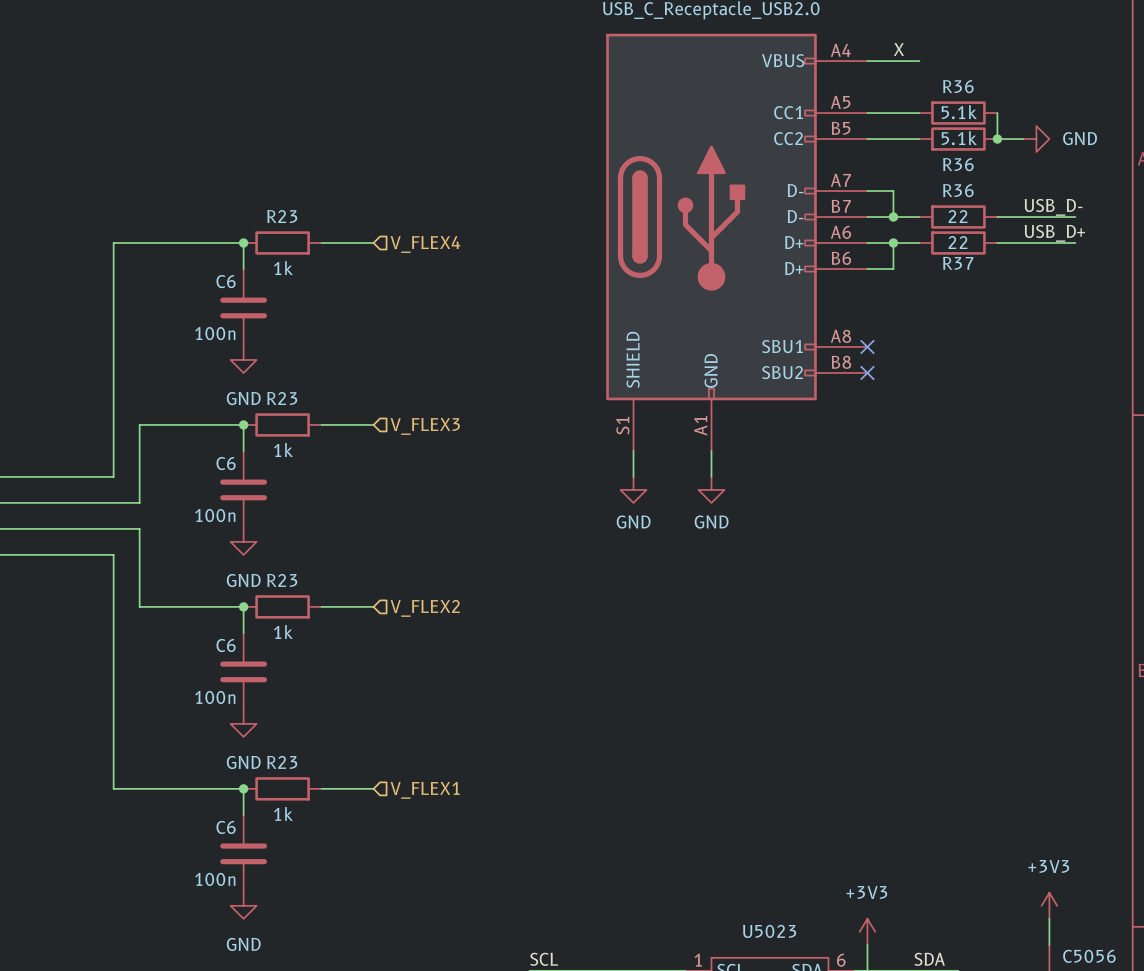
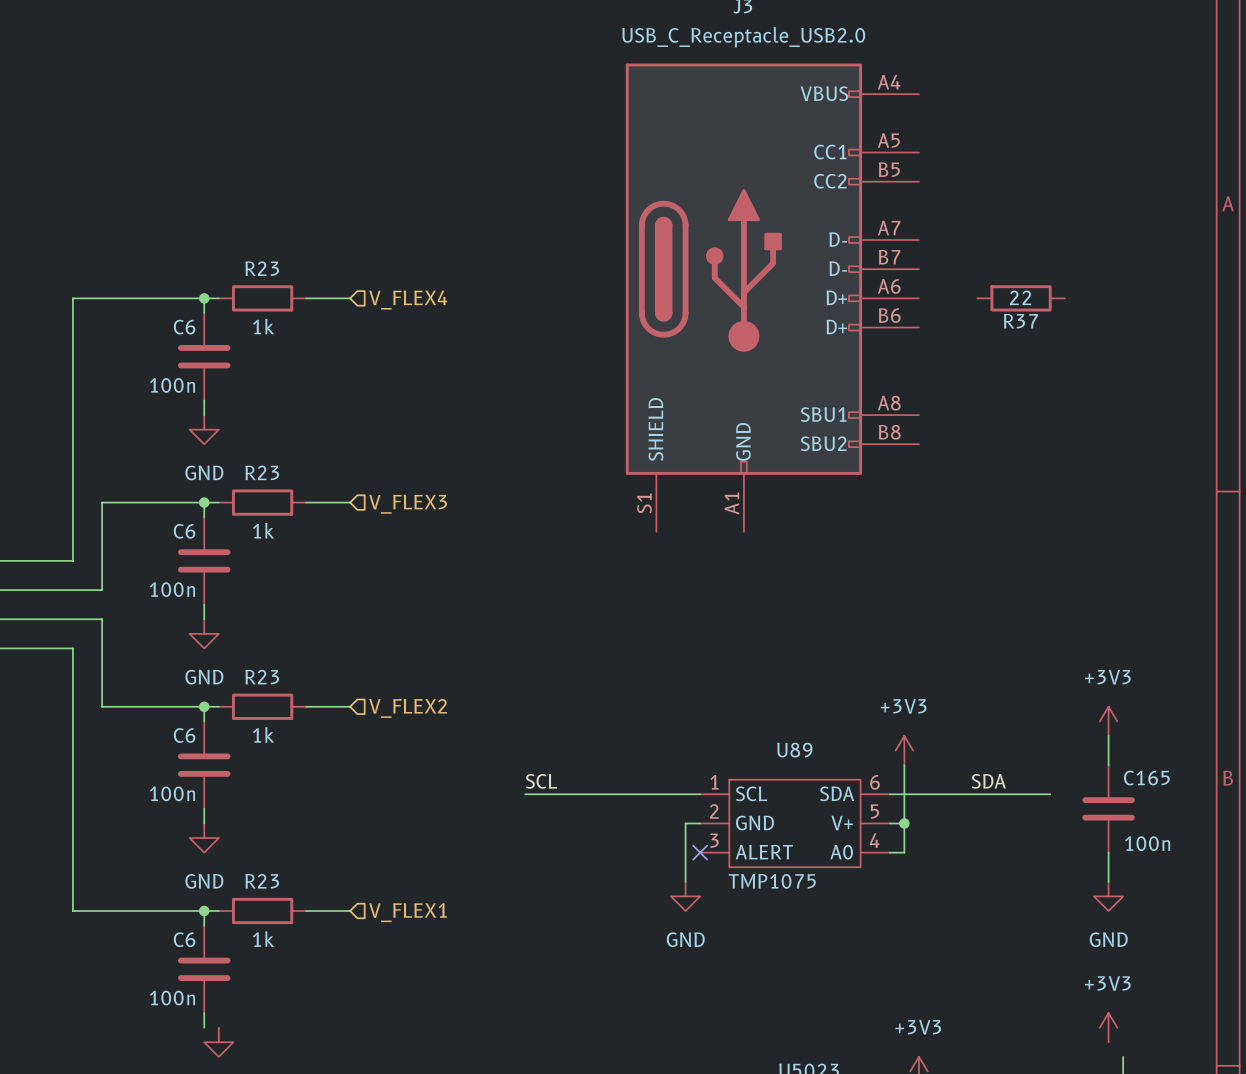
label: X (898, 49) -> none
wire: (867, 61) (919, 61) -> none
wire: (867, 113) (919, 113) -> none
R36: 5.1k (958, 113) -> none
wire: (997, 113) (997, 139) (1023, 139) -> none
wire: (867, 139) (919, 139) -> none
R36: 5.1k (958, 139) -> none
junction: (997, 139) -> none
power symbol: GND (1036, 139) -> none
wire: (867, 191) (893, 191) (893, 217) -> none
label: USB_D- (1053, 207) -> none
wire: (867, 217) (919, 217) -> none
junction: (893, 217) -> none
R36: 22 (958, 217) -> none
wire: (997, 217) (1075, 217) -> none
label: USB_D+ (1054, 233) -> none
wire: none -> (204, 298) (204, 312)
wire: (243, 243) (243, 268) -> none
junction position: (243, 243) -> (204, 298)
wire: (360, 243) (373, 243) -> none
wire: (867, 243) (919, 243) -> none
wire: (893, 243) (893, 268) (867, 268) -> none
junction: (893, 243) -> none
wire: (997, 243) (1075, 243) -> none
hierarchical label position: V_FLEX4 (425, 244) -> V_FLEX4 (408, 300)
C6 position: (243, 307) -> (204, 356)
wire: none -> (204, 400) (204, 415)
no-connect mark: (867, 346) -> none
power symbol position: GND (243, 359) -> GND (204, 429)
no-connect mark: (867, 372) -> none
wire: none -> (204, 502) (204, 517)
wire: (243, 424) (243, 450) -> none
junction position: (243, 424) -> (204, 502)
wire: (360, 424) (373, 424) -> none
hierarchical label position: V_FLEX3 (425, 426) -> V_FLEX3 (408, 504)
wire: (633, 450) (633, 476) -> none
wire: (711, 450) (711, 476) -> none
C6 position: (243, 489) -> (204, 560)
power symbol: GND (633, 489) -> none
power symbol: GND (711, 489) -> none
wire: none -> (204, 604) (204, 619)
power symbol position: GND (243, 541) -> GND (204, 633)
wire: none -> (204, 706) (204, 721)
wire: (243, 606) (243, 632) -> none
junction position: (243, 606) -> (204, 706)
wire: (360, 606) (373, 606) -> none
hierarchical label position: V_FLEX2 (425, 608) -> V_FLEX2 (408, 708)
power symbol: none -> +3V3 (1108, 721)
wire: none -> (1108, 735) (1108, 765)
power symbol: none -> +3V3 (904, 750)
wire: none -> (904, 765) (904, 852) (889, 852)
C6 position: (243, 671) -> (204, 765)
label: none -> SCL (541, 781)
label: none -> SDA (988, 781)
wire: none -> (525, 794) (700, 794)
wire: none -> (889, 794) (1050, 794)
wire: none -> (204, 808) (204, 823)
C165: none -> 100n (1108, 808)
wire: none -> (700, 823) (685, 823) (685, 881)
U89: none -> TMP1075 (794, 823)
wire: none -> (889, 823) (904, 823)
junction: none -> (904, 823)
power symbol position: GND (243, 723) -> GND (204, 838)
no-connect mark: none -> (700, 852)
wire: none -> (1108, 852) (1108, 881)
power symbol: none -> GND (685, 896)
power symbol: none -> GND (1108, 896)
wire: none -> (204, 910) (204, 925)
wire: (243, 788) (243, 814) -> none
junction position: (243, 788) -> (204, 910)
wire: (360, 788) (373, 788) -> none
hierarchical label position: V_FLEX1 (425, 790) -> V_FLEX1 (408, 912)
C6 position: (243, 853) -> (204, 969)
wire: none -> (204, 1013) (204, 1027)
power symbol position: +3V3 (1049, 905) -> +3V3 (1108, 1027)

